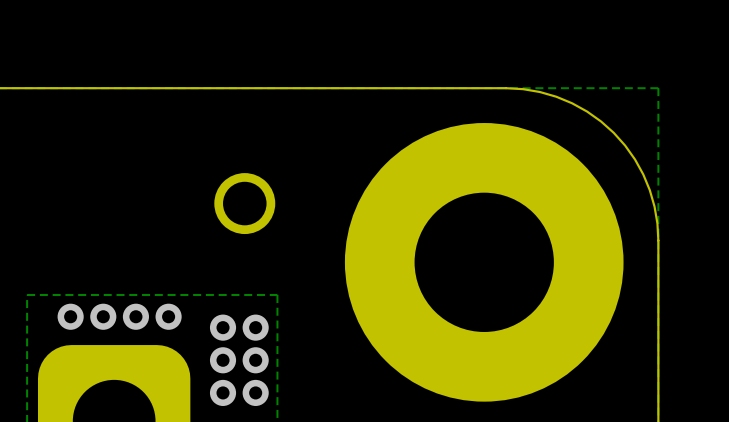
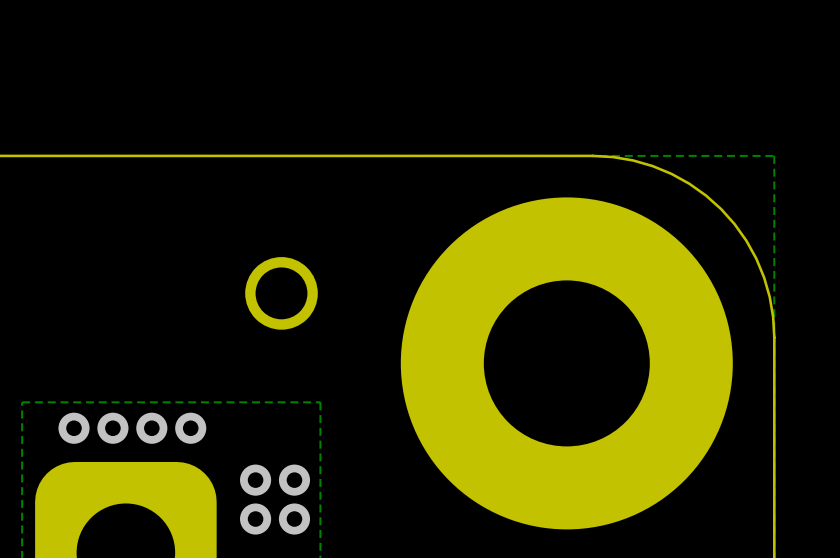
via: (223, 327) -> none
via: (255, 327) -> none

